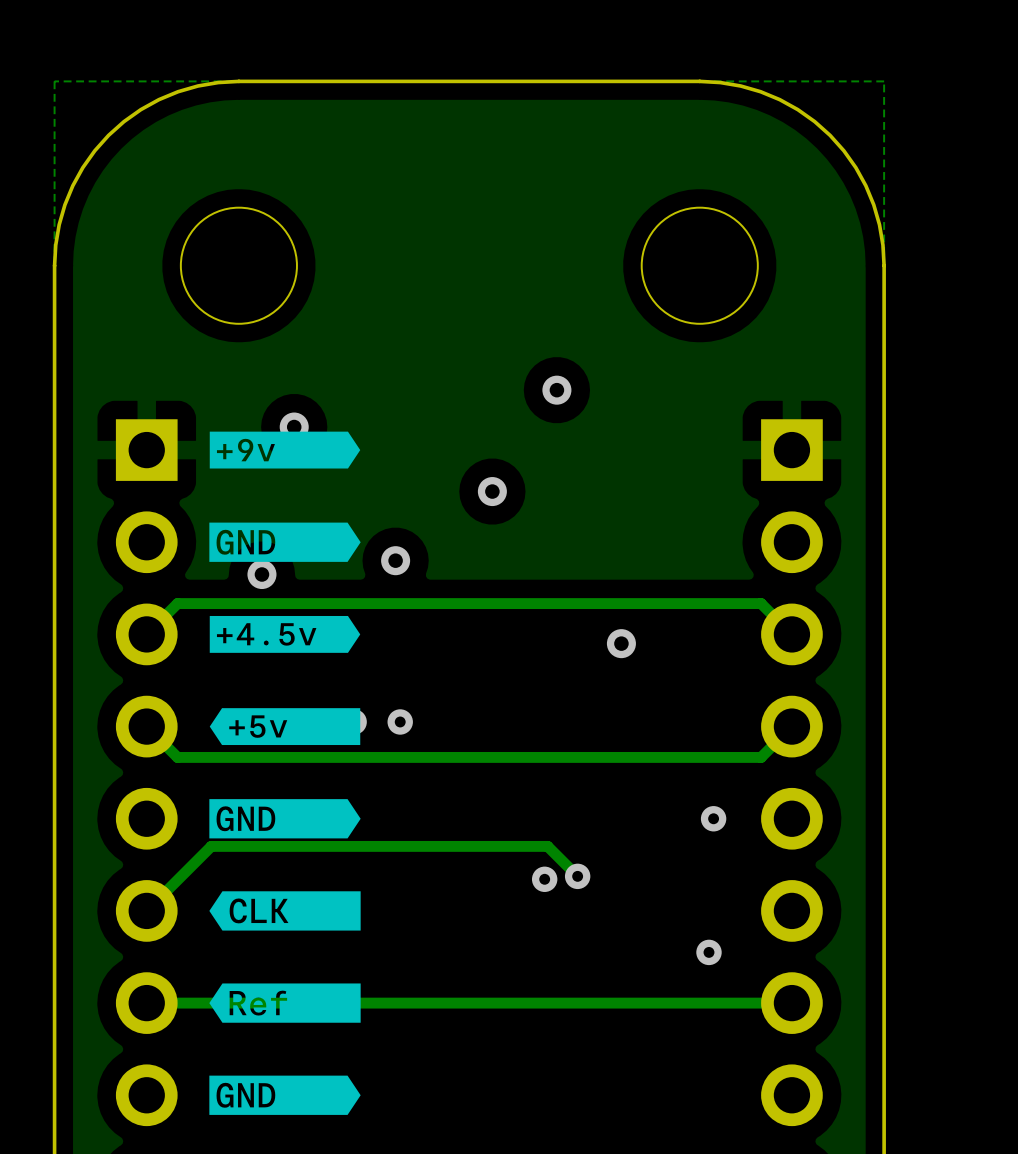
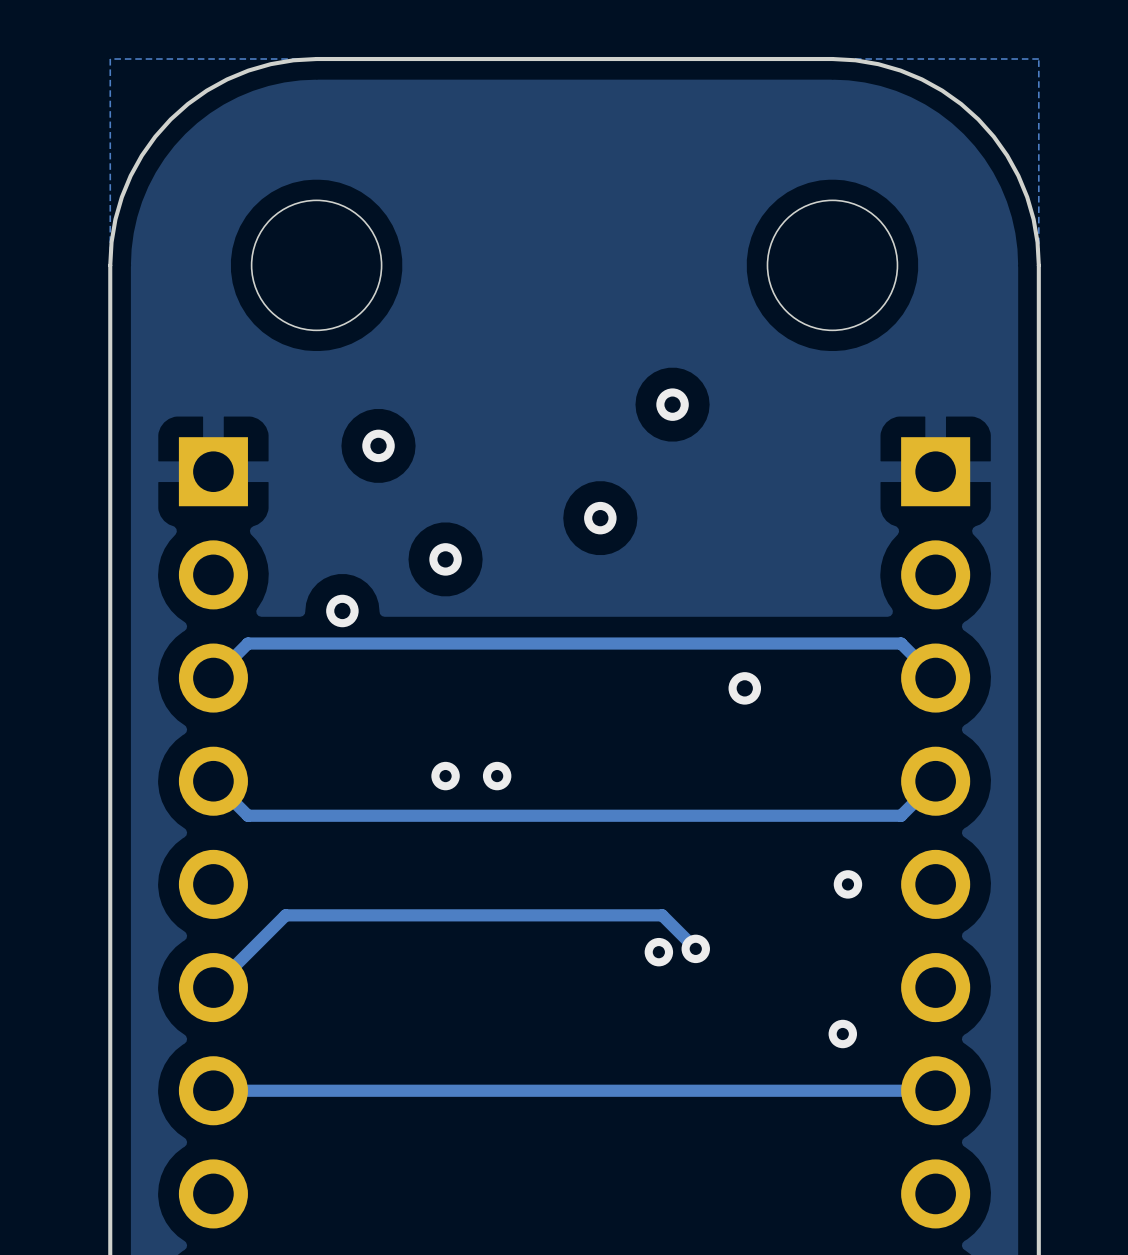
drawing: [209, 431, 361, 469] -> none
drawing: [209, 522, 361, 562] -> none
via position: (395, 560) -> (445, 559)
drawing: [209, 615, 361, 653] -> none
drawing: [209, 708, 361, 746] -> none
drawing: [209, 799, 361, 839] -> none
drawing: [209, 891, 361, 931] -> none
drawing: [209, 983, 361, 1023] -> none
drawing: [209, 1075, 361, 1115] -> none

